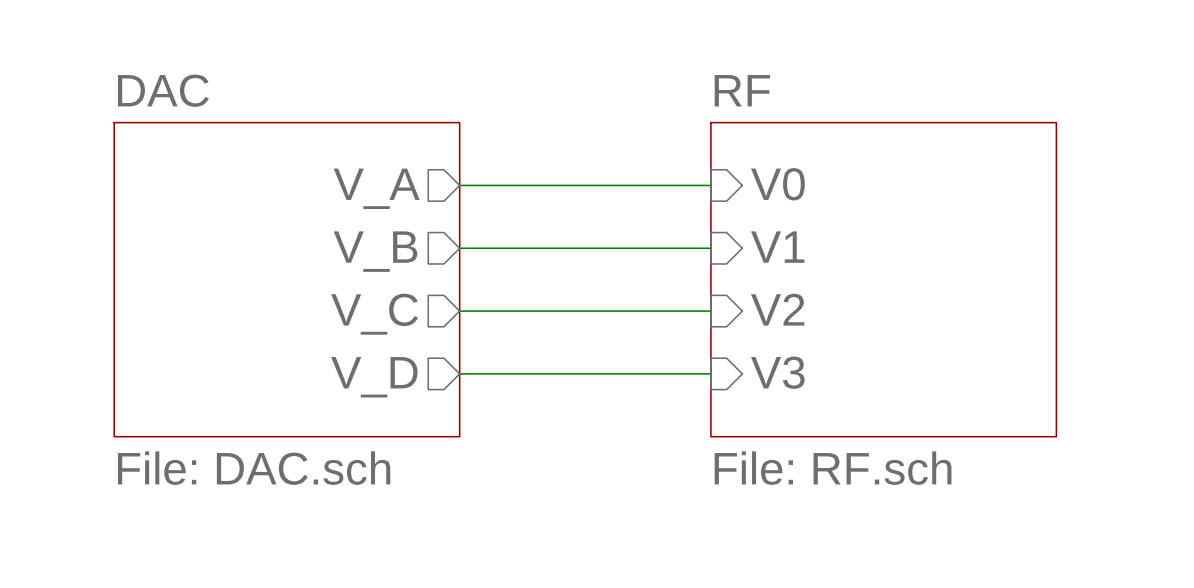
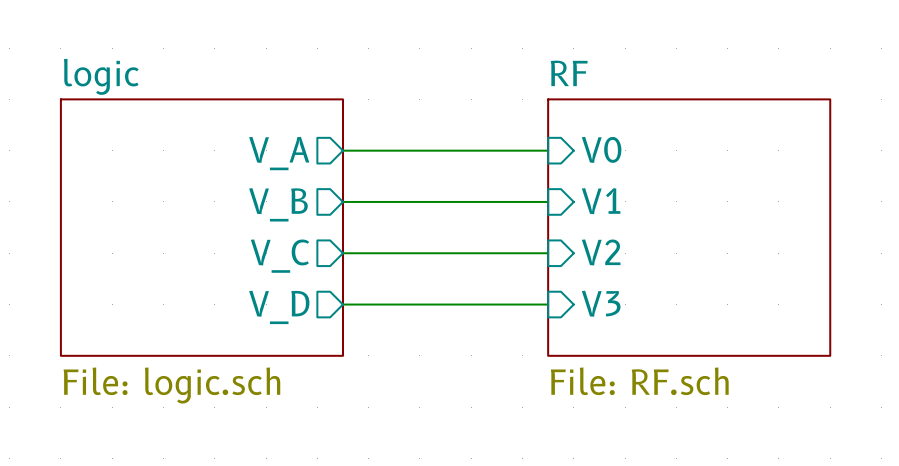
sheet DAC name: DAC (163, 90) -> logic (101, 76)
sheet DAC value: File: DAC.sch (254, 468) -> File: logic.sch (171, 385)

